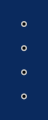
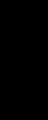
via: (24, 24) -> none
via: (24, 48) -> none
via: (24, 72) -> none
via: (24, 96) -> none

